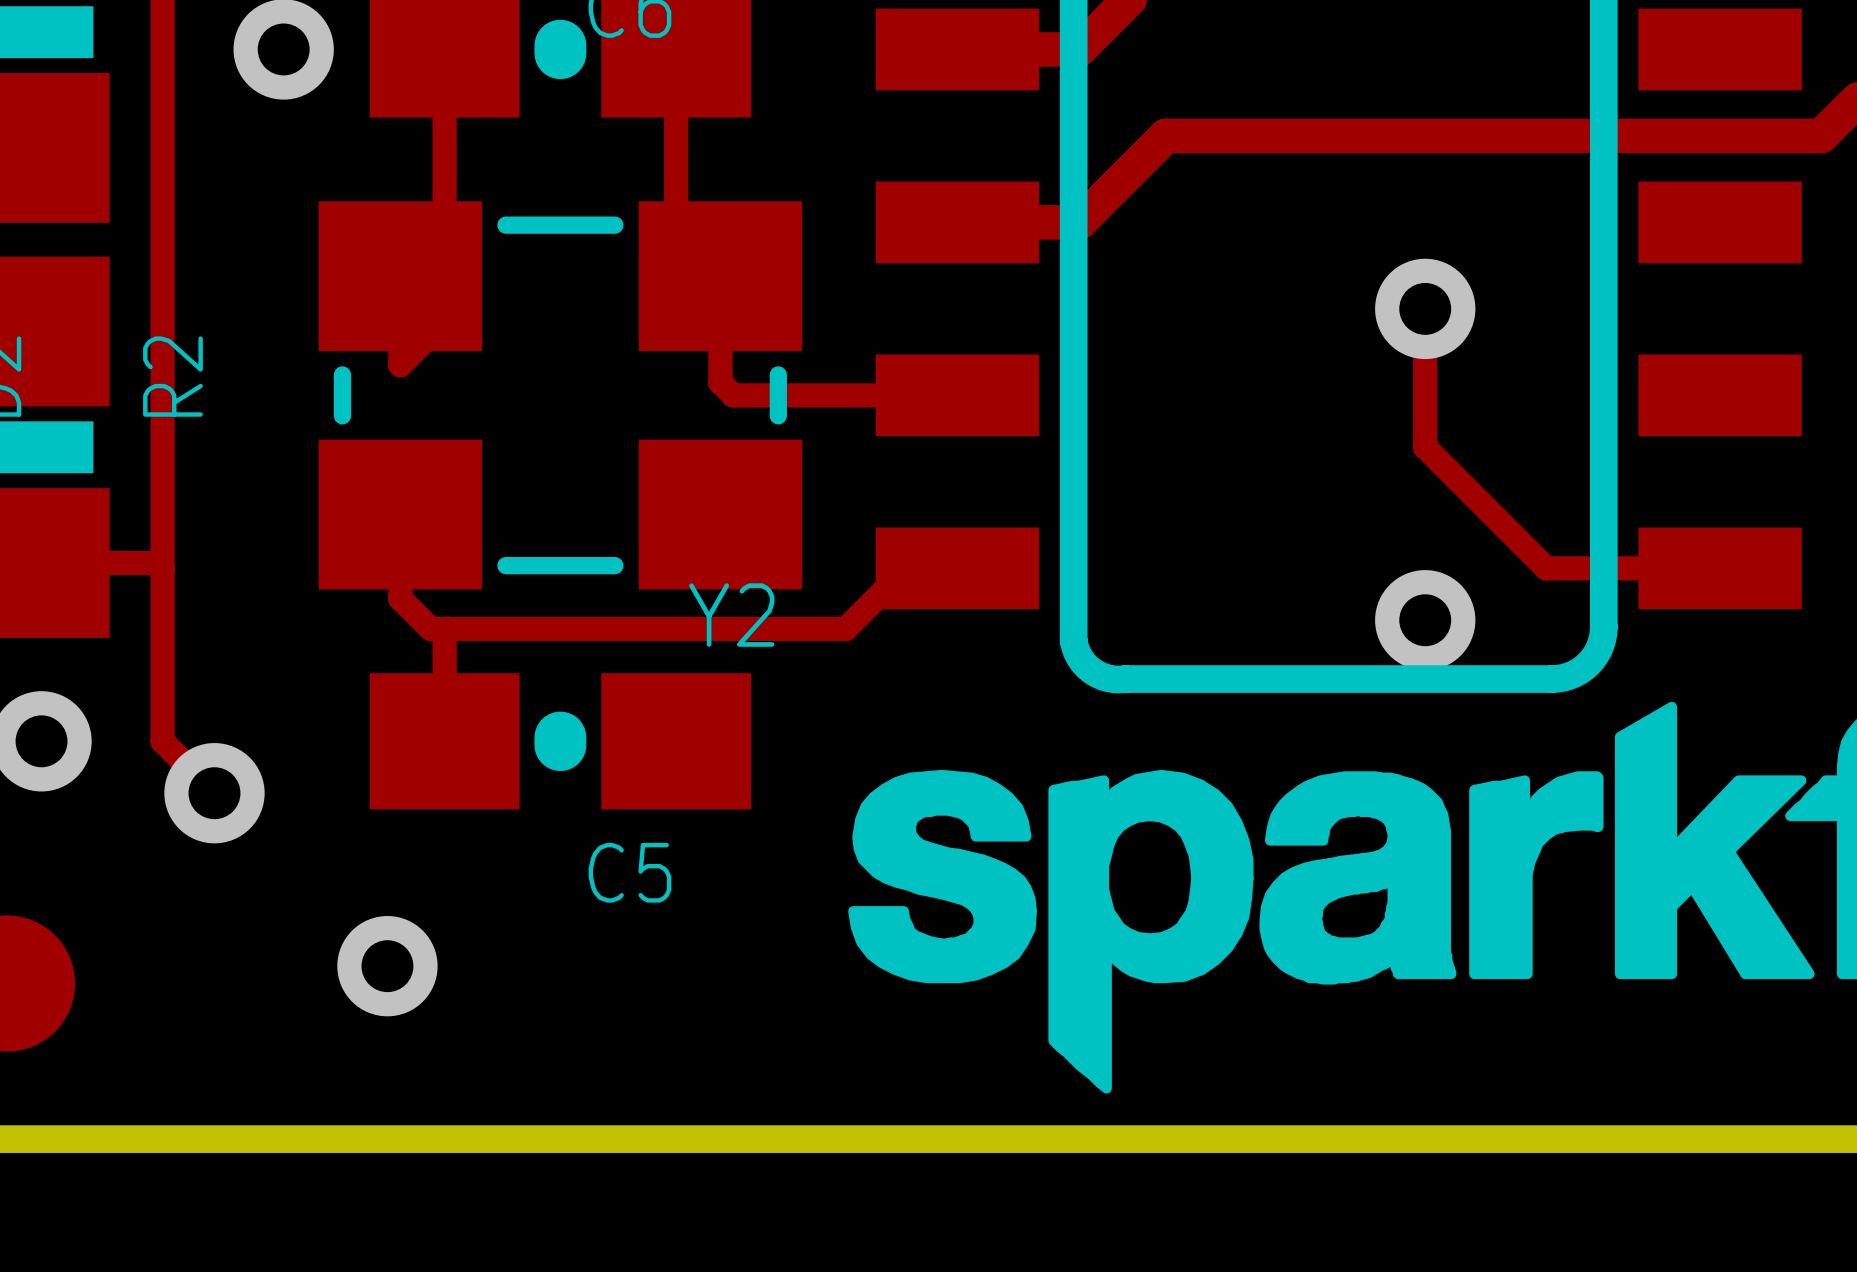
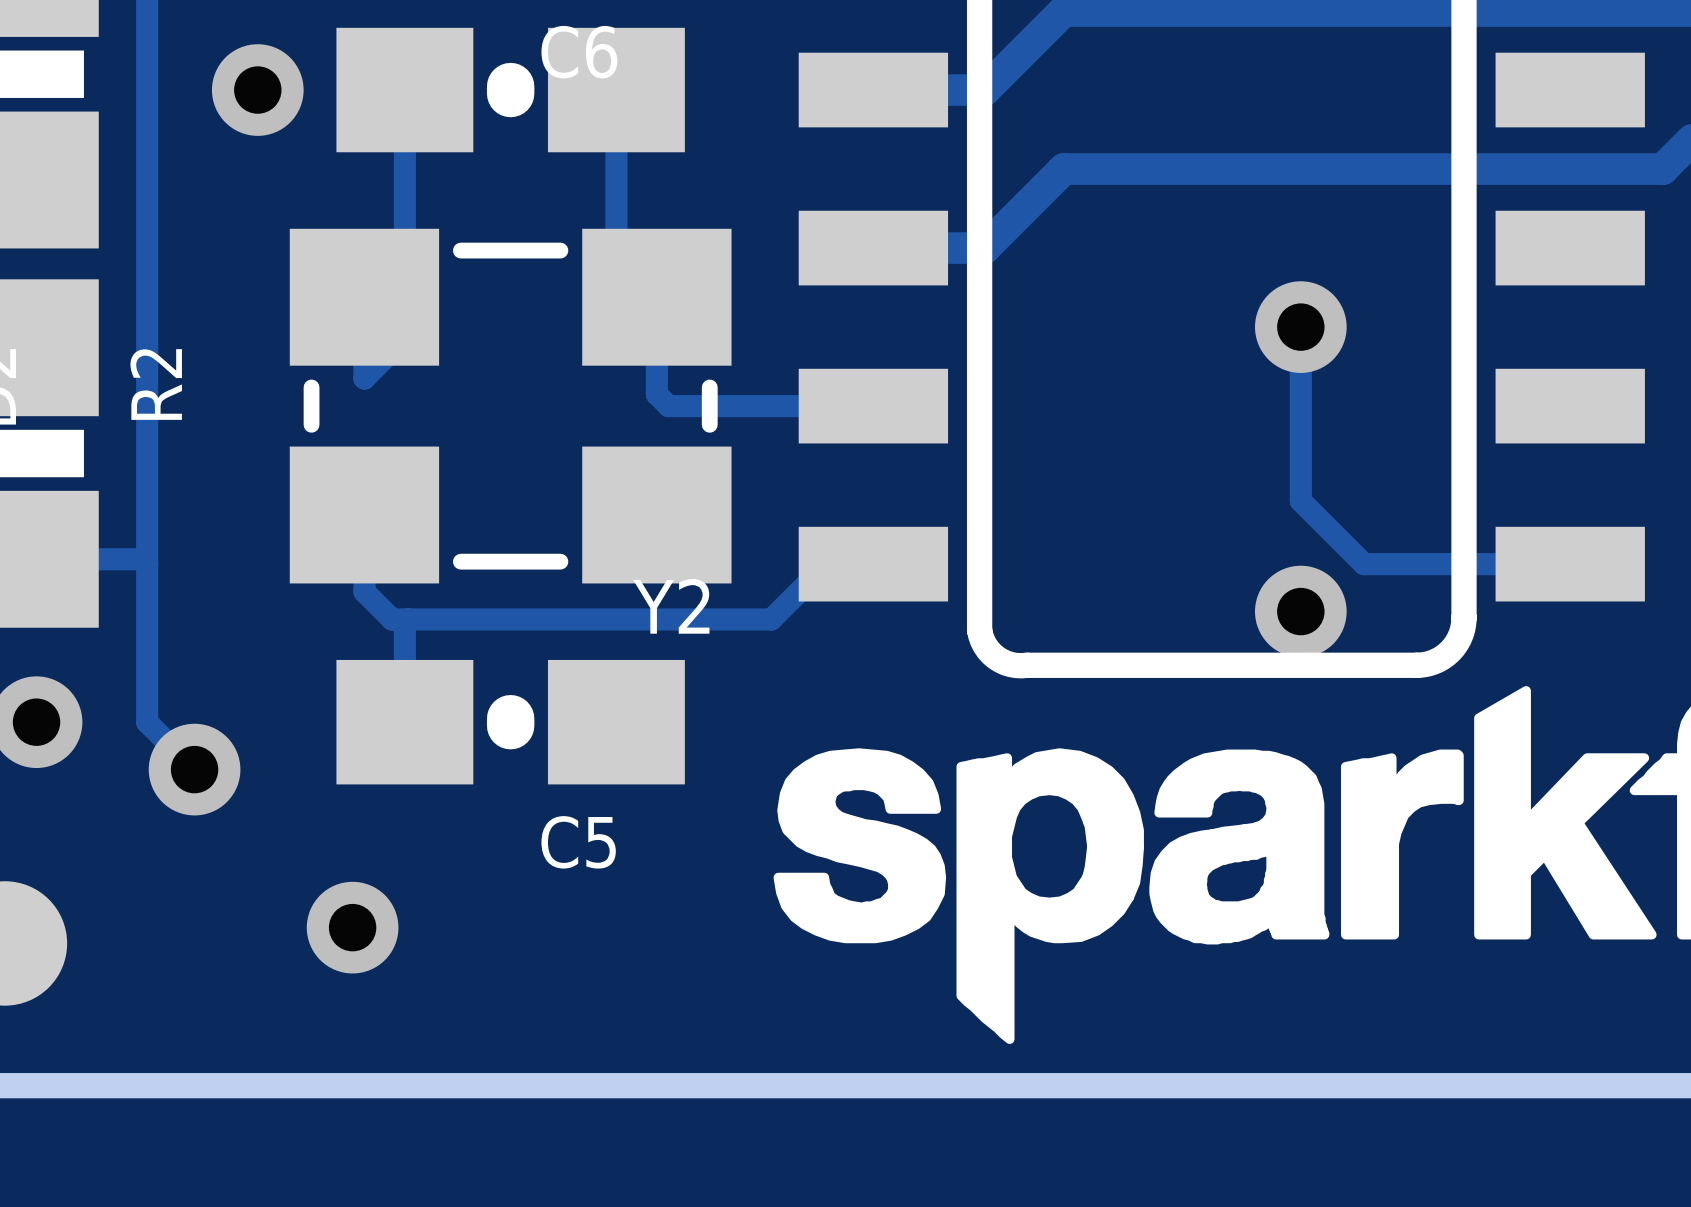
track: (1425, 447) (1546, 568) -> (1300, 453) (1300, 500) (1364, 564) (1411, 564)

